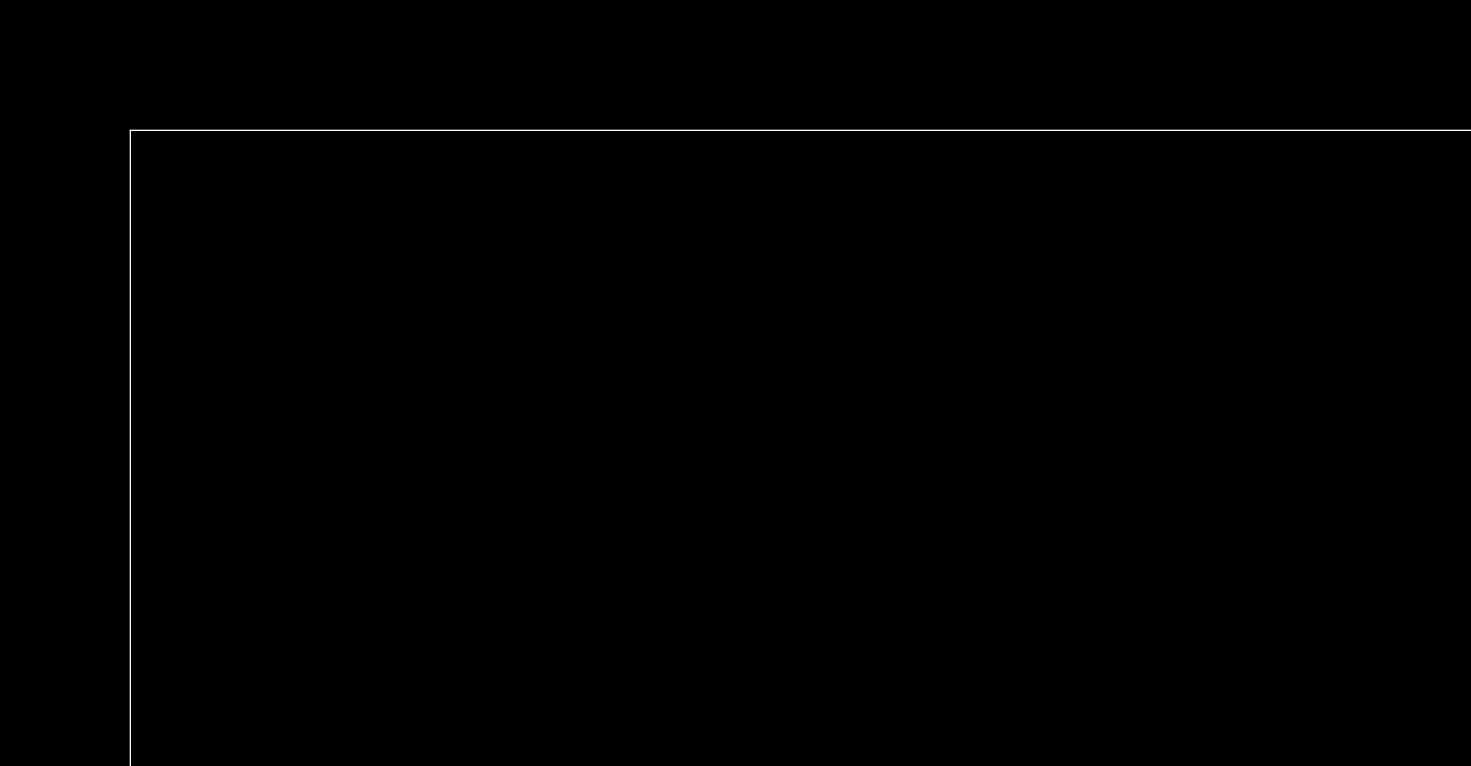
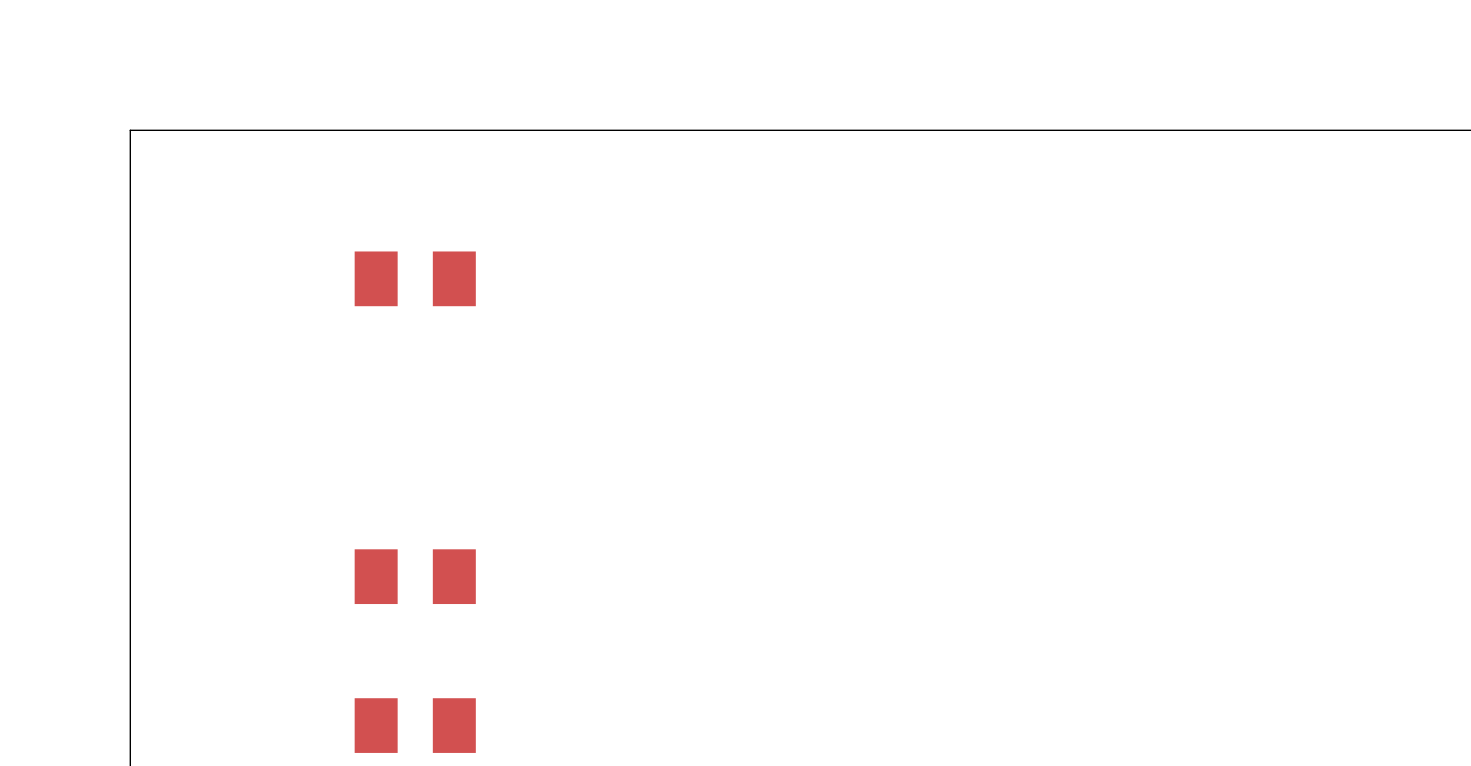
part: none -> (415, 278)
part: none -> (415, 576)
part: none -> (415, 725)

